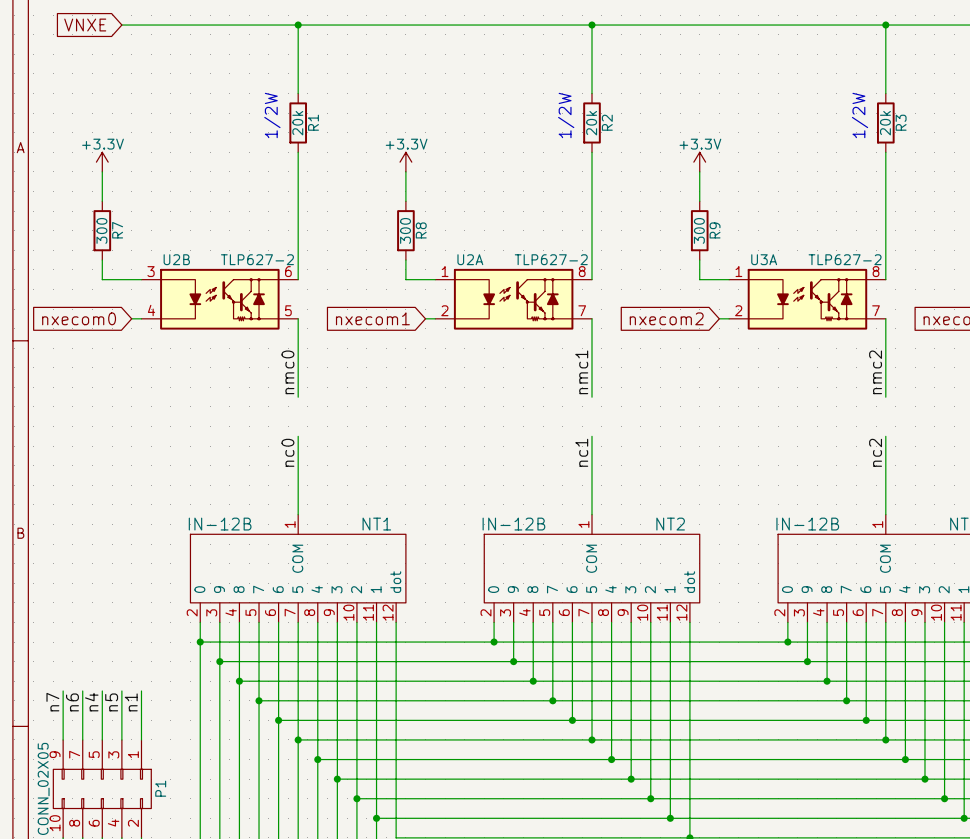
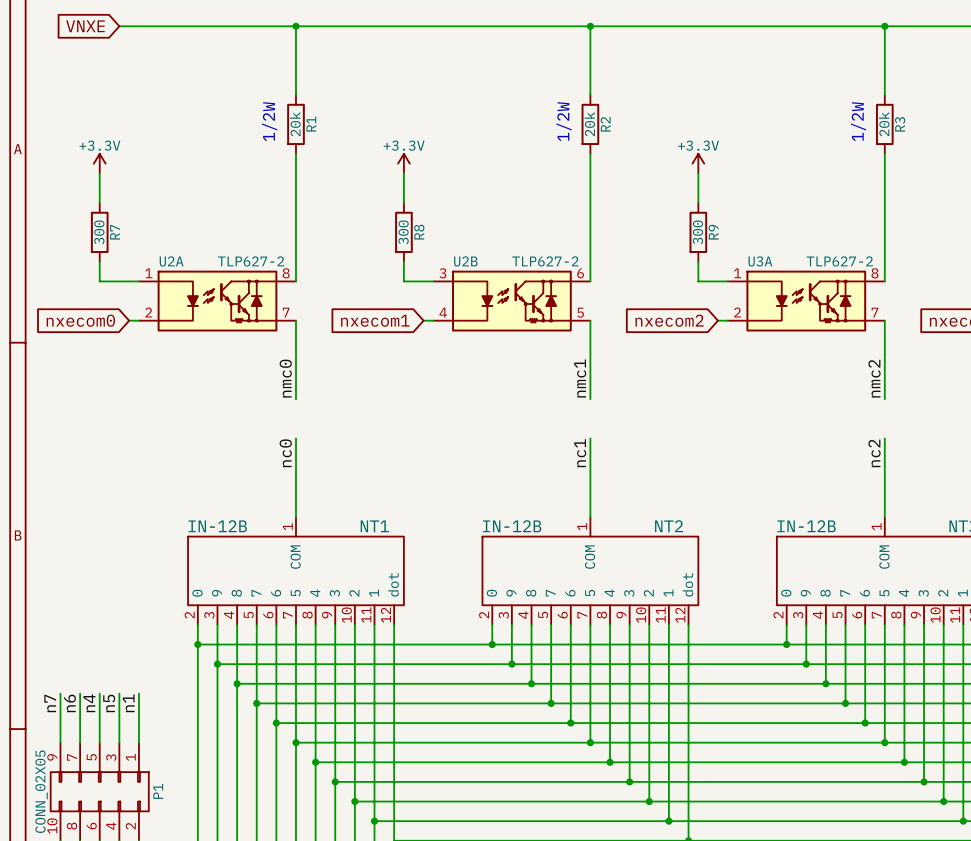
U2B position: (219, 299) -> (511, 301)
U2A position: (513, 299) -> (217, 301)

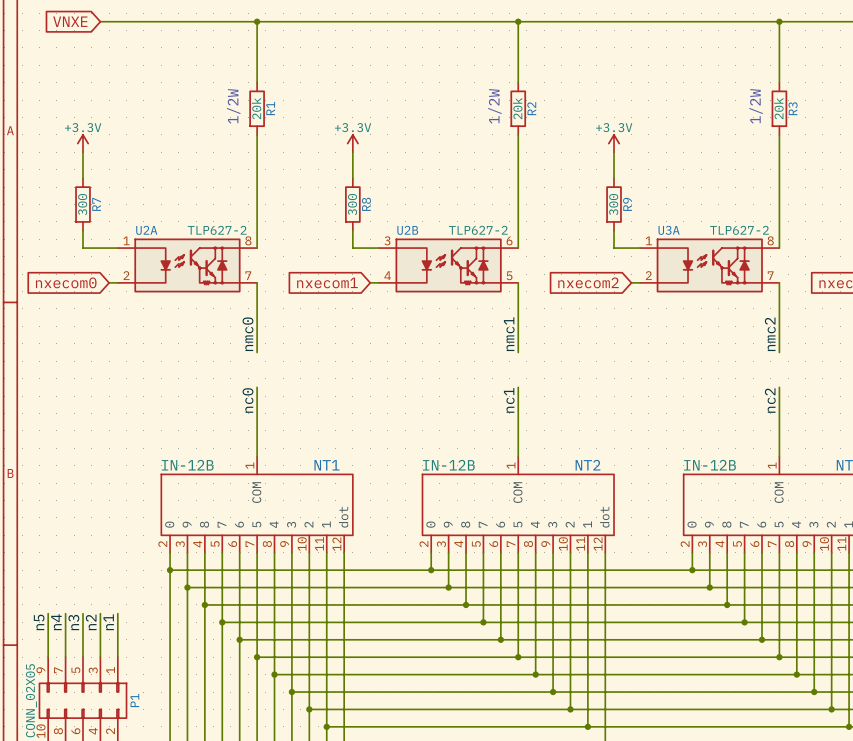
label: n7 (50, 703) -> n5 (39, 622)
label: n6 (69, 703) -> n4 (56, 622)
label: n4 (89, 703) -> n3 (73, 622)
label: n5 (109, 703) -> n2 (91, 622)

